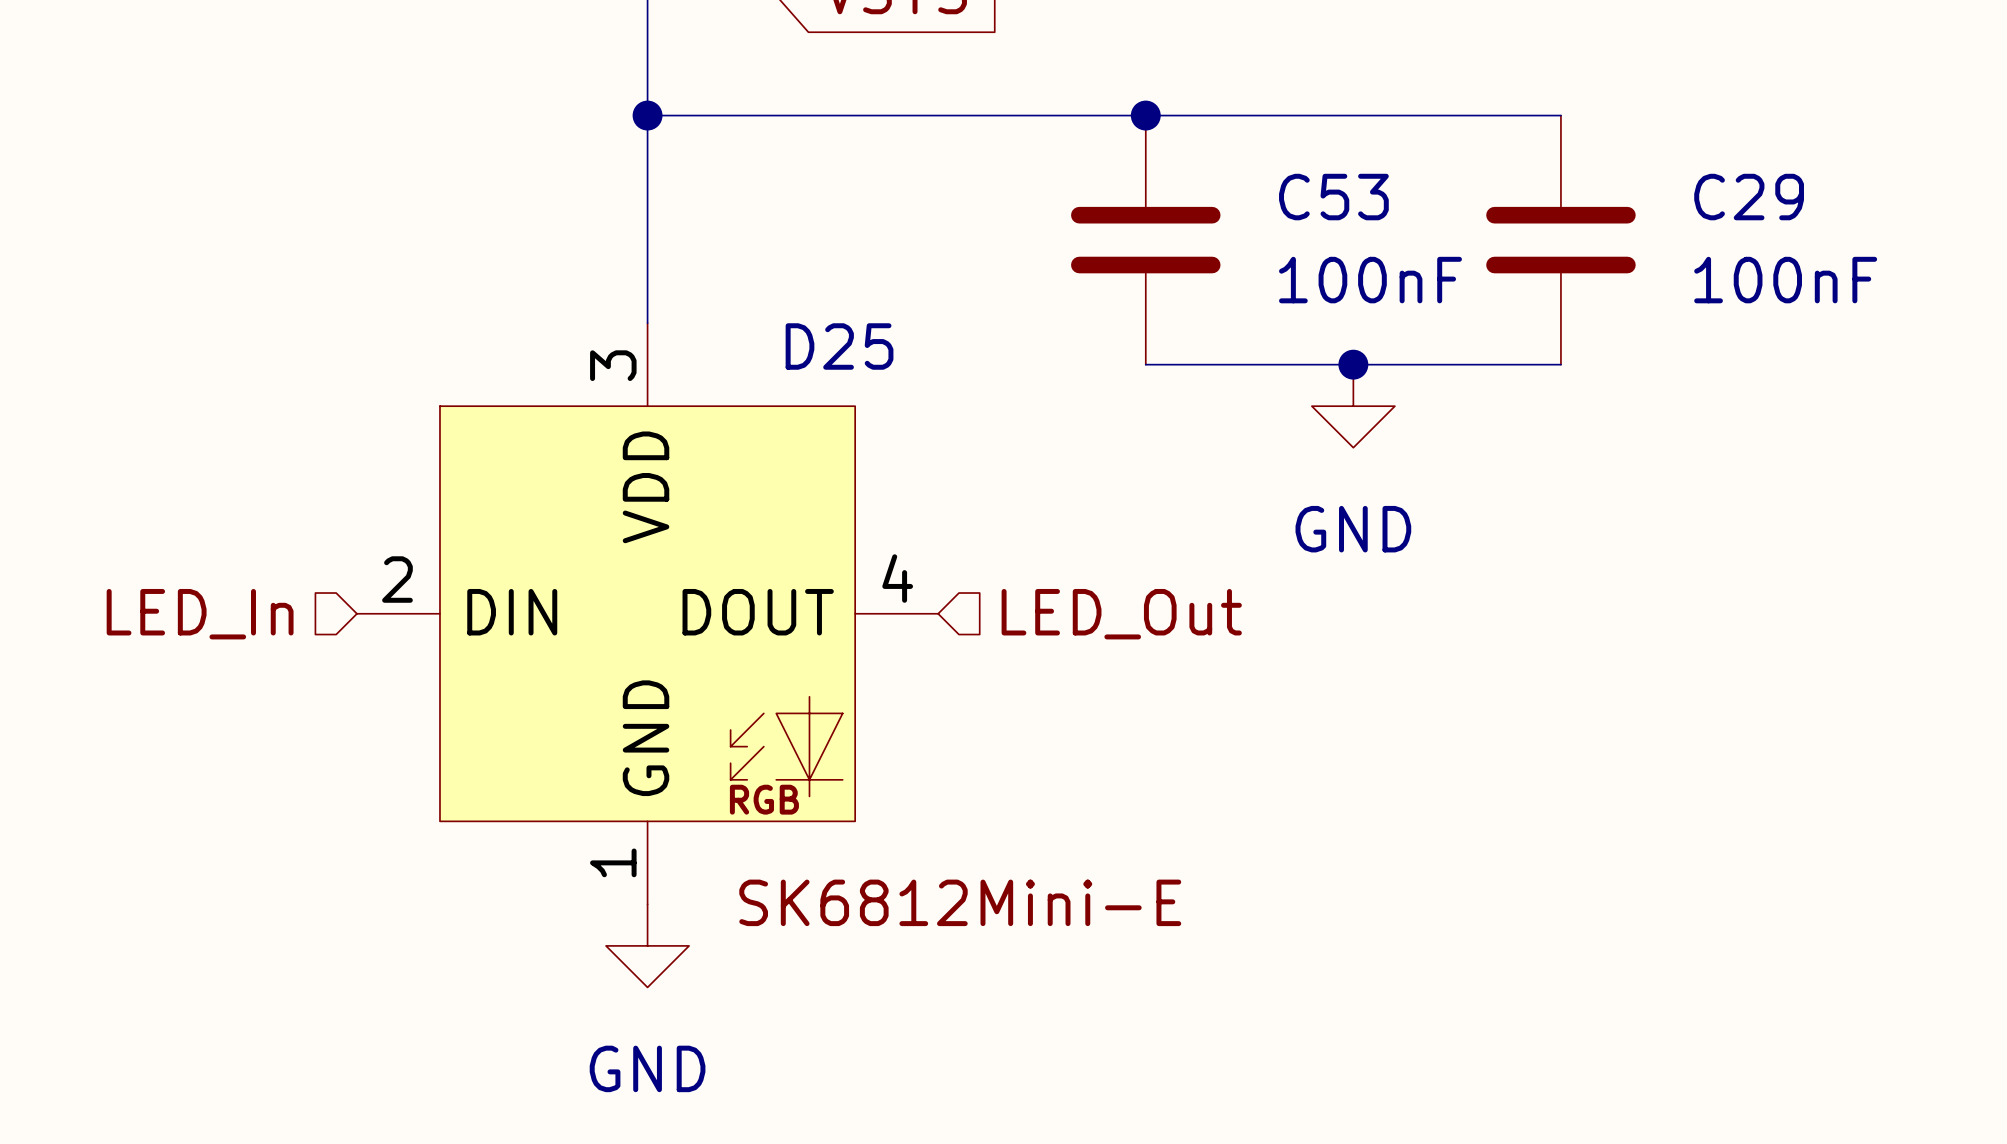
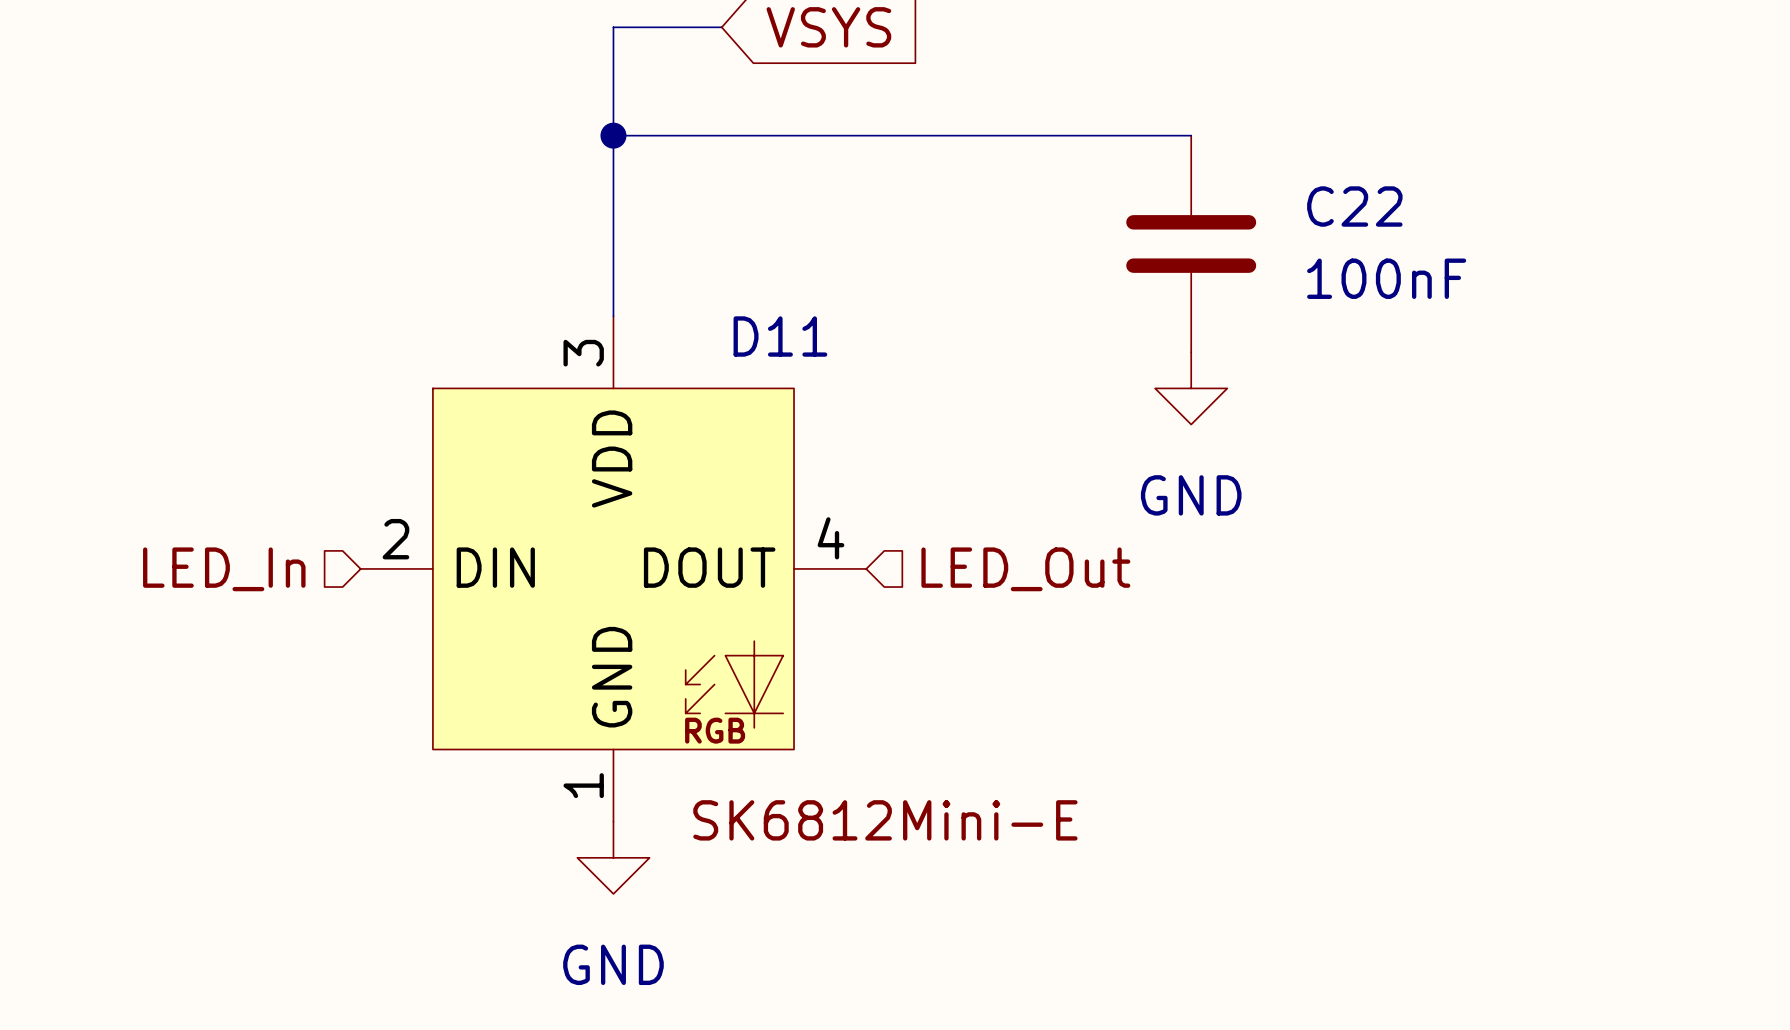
junction: (1145, 115) -> none
wire: (1311, 115) (1560, 115) -> none
C53: 100nF (1145, 240) -> none
C22: none -> 100nF (1191, 243)
C29: 100nF (1560, 240) -> none
D25 name: D25 (839, 346) -> D11 (780, 336)
wire: (1145, 364) (1560, 364) -> none
junction: (1353, 364) -> none
power symbol position: GND (1353, 406) -> GND (1191, 388)

